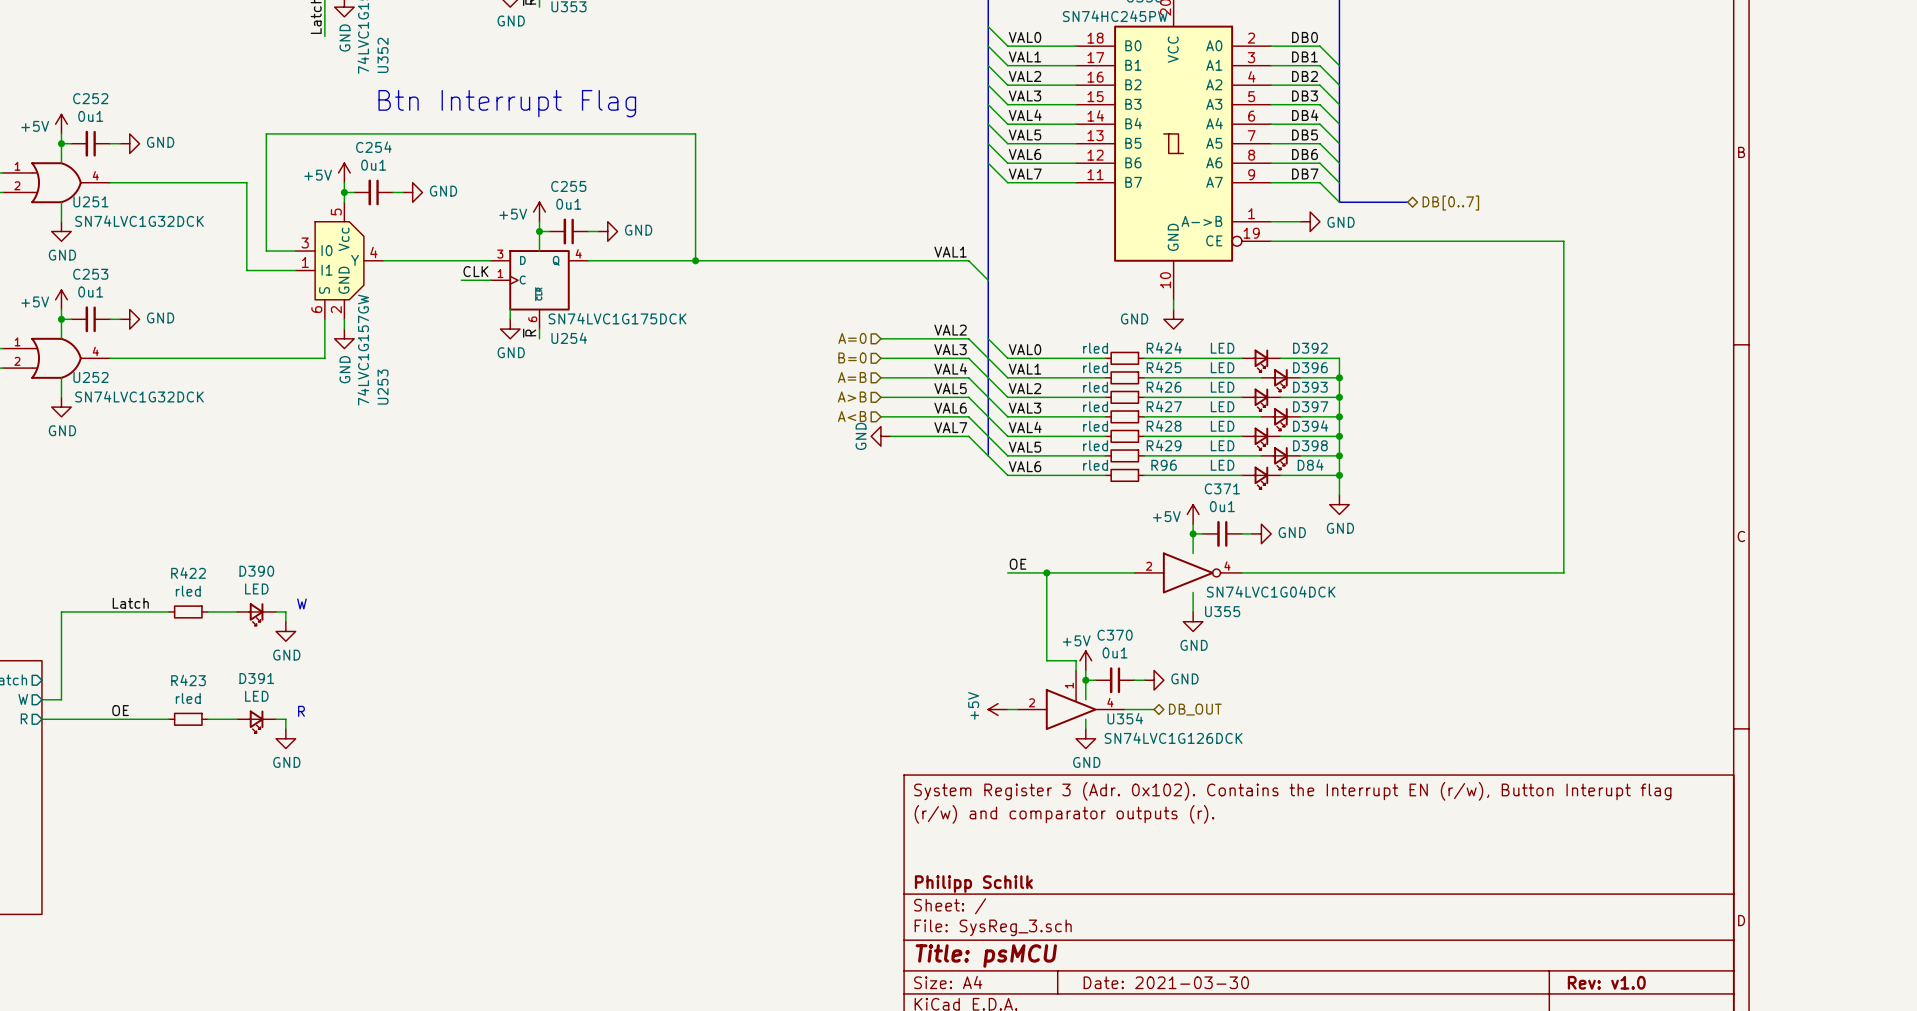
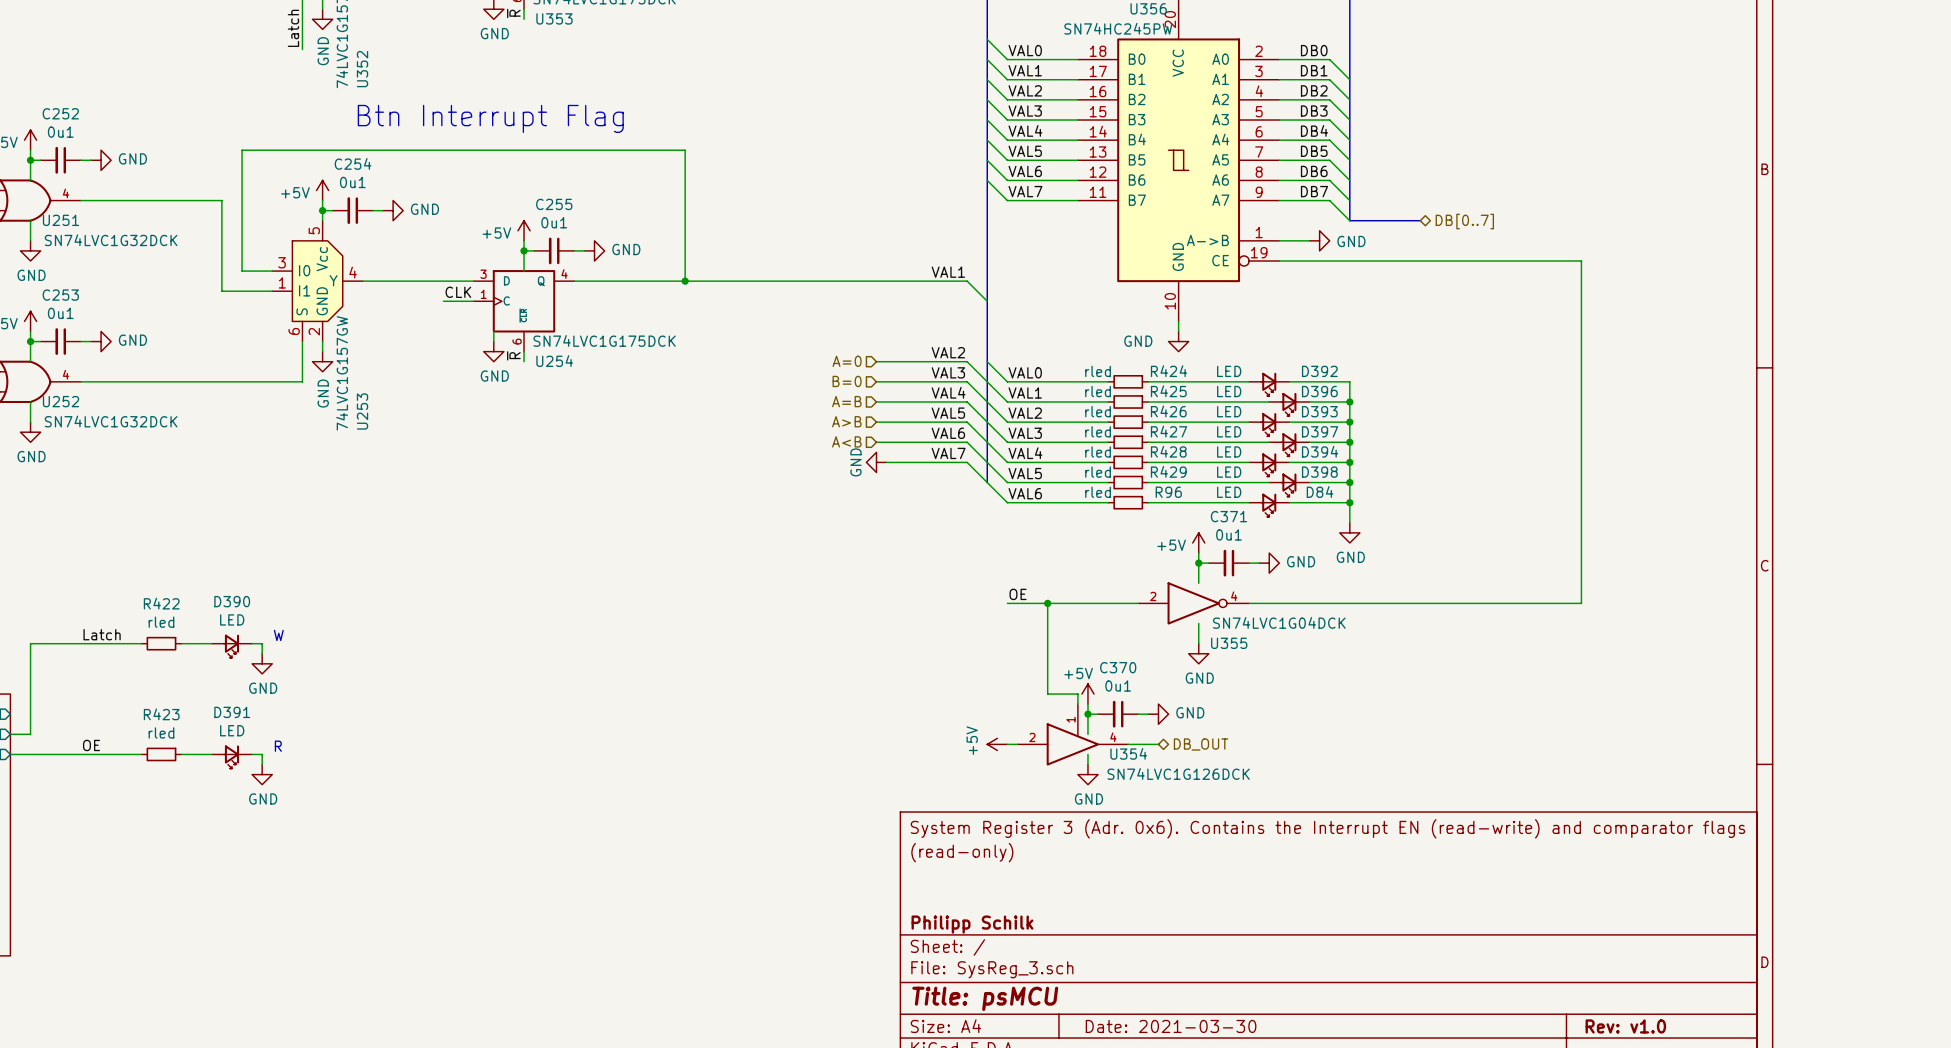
title block: System Register 3 (Adr. 0x102). Contains the Interrupt EN (r/w), Button Interupt flag (1292, 791) -> System Register 3 (Adr. 0x6). Contains the Interrupt EN (read-write) and comparator flags (1327, 828)
title block: (r/w) and comparator outputs (r). (1064, 814) -> (read-only) (962, 852)

